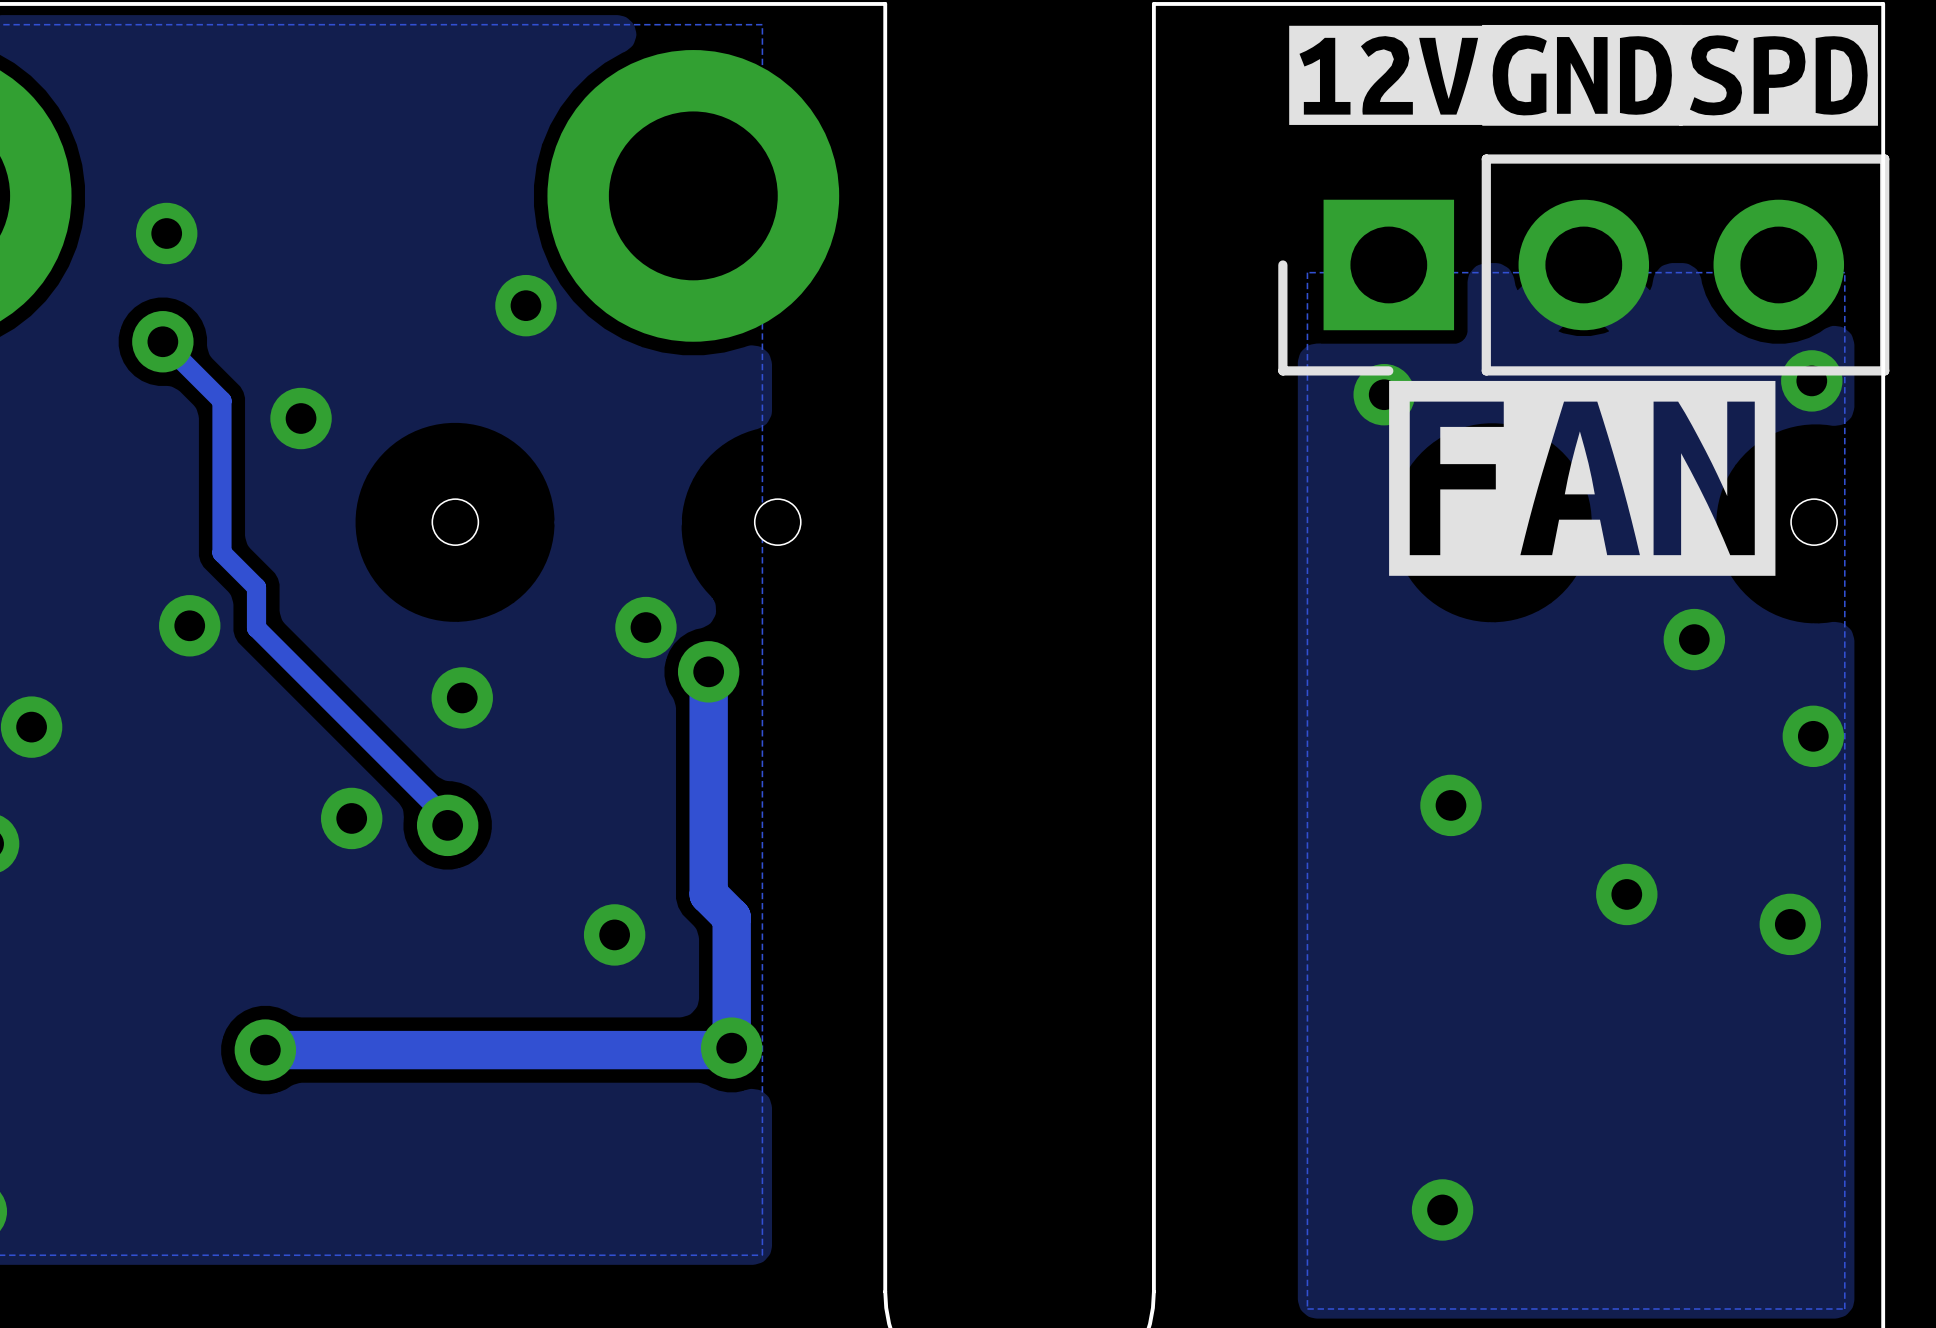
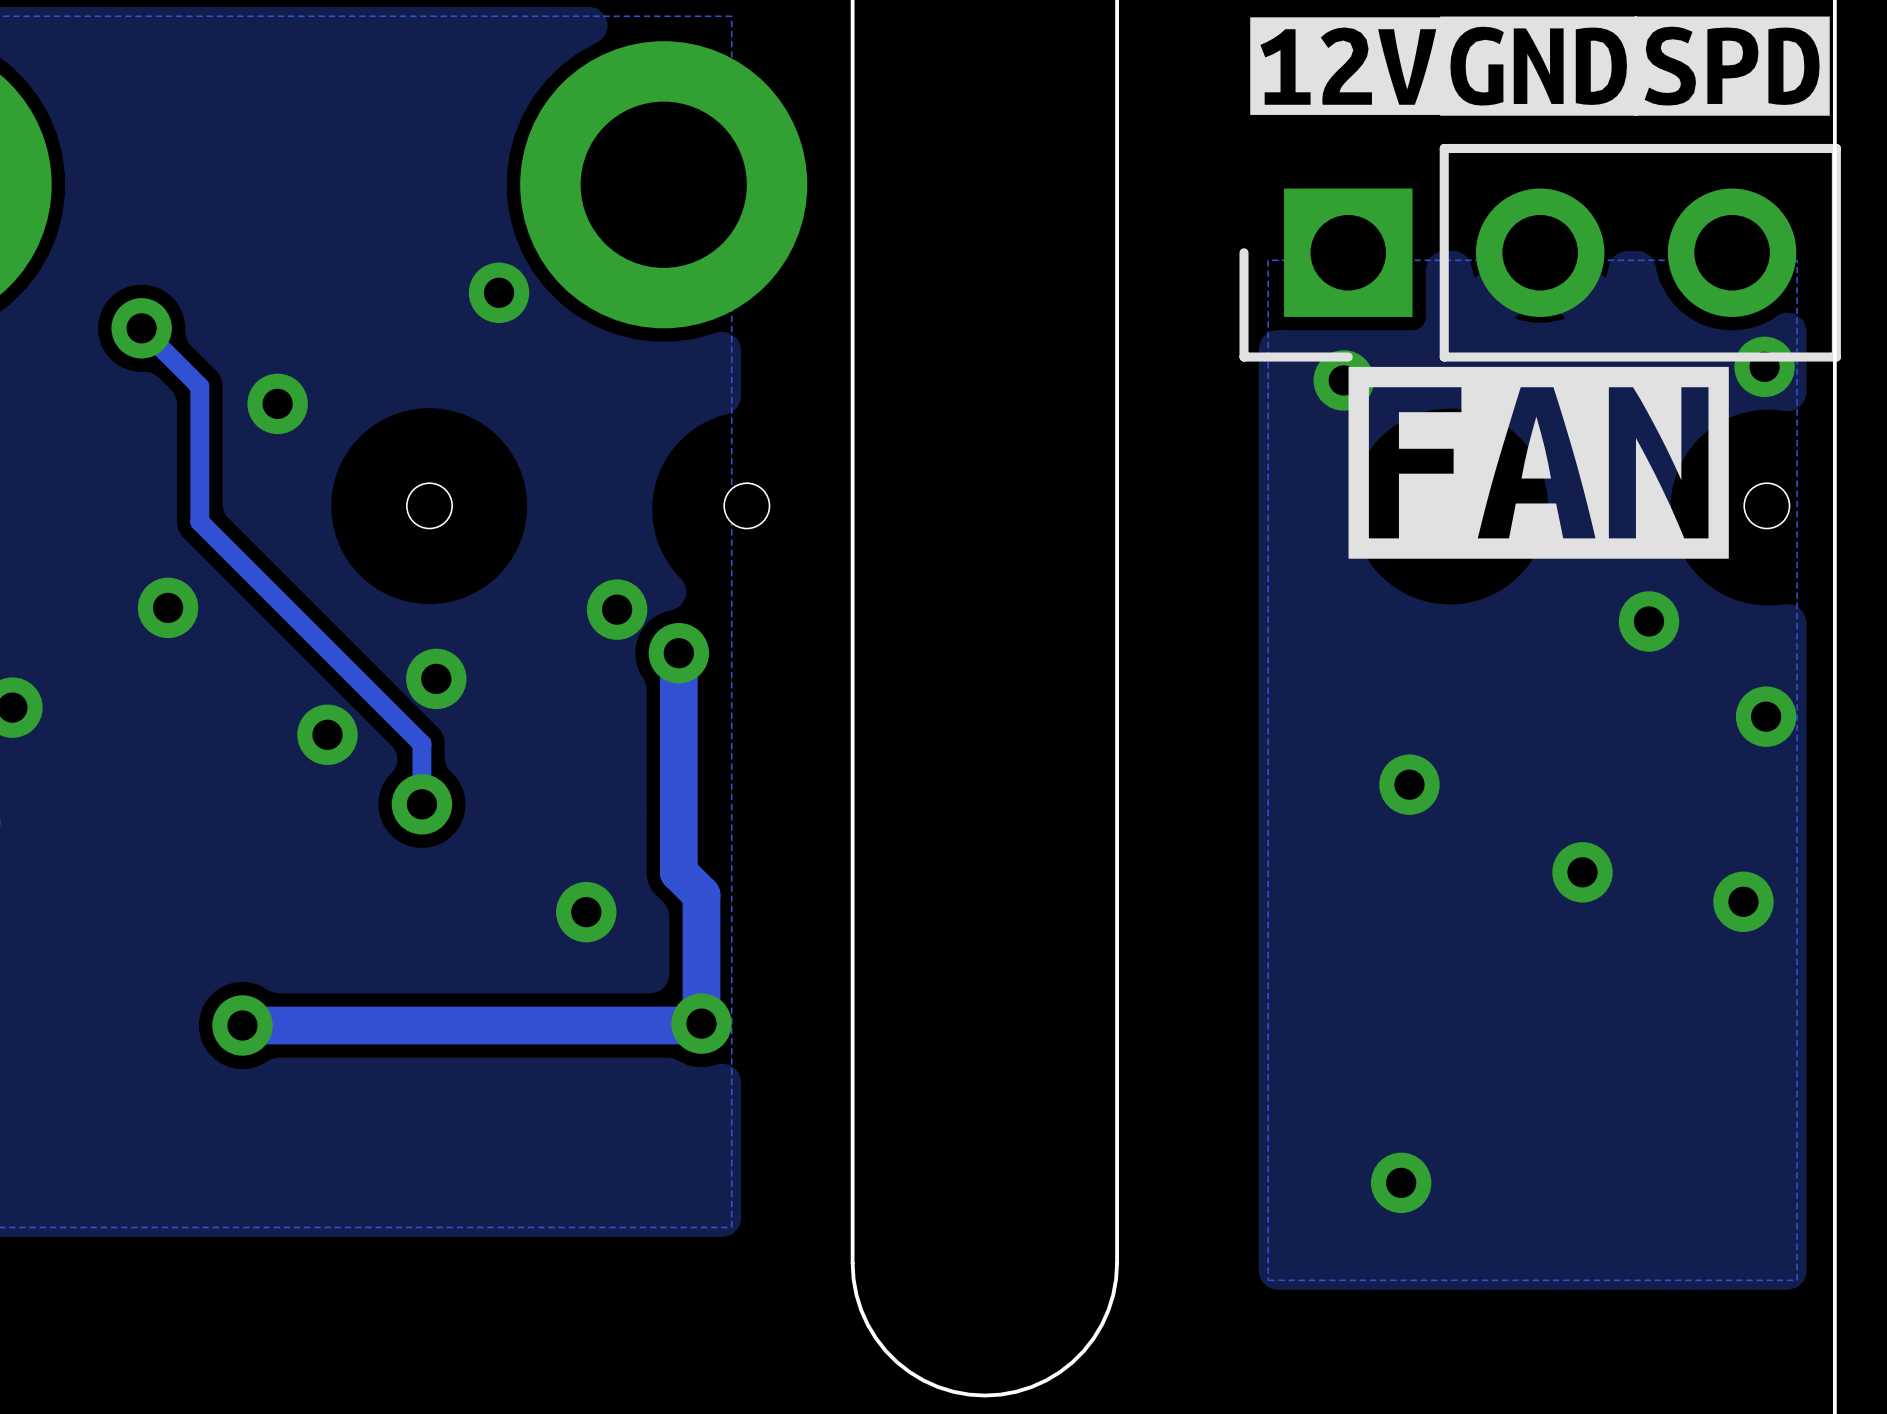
via: (166, 233) -> none
track: (221, 538) (221, 552) (256, 587) (256, 628) (447, 819) -> (199, 521) (421, 743) (421, 798)
via position: (351, 818) -> (327, 734)

